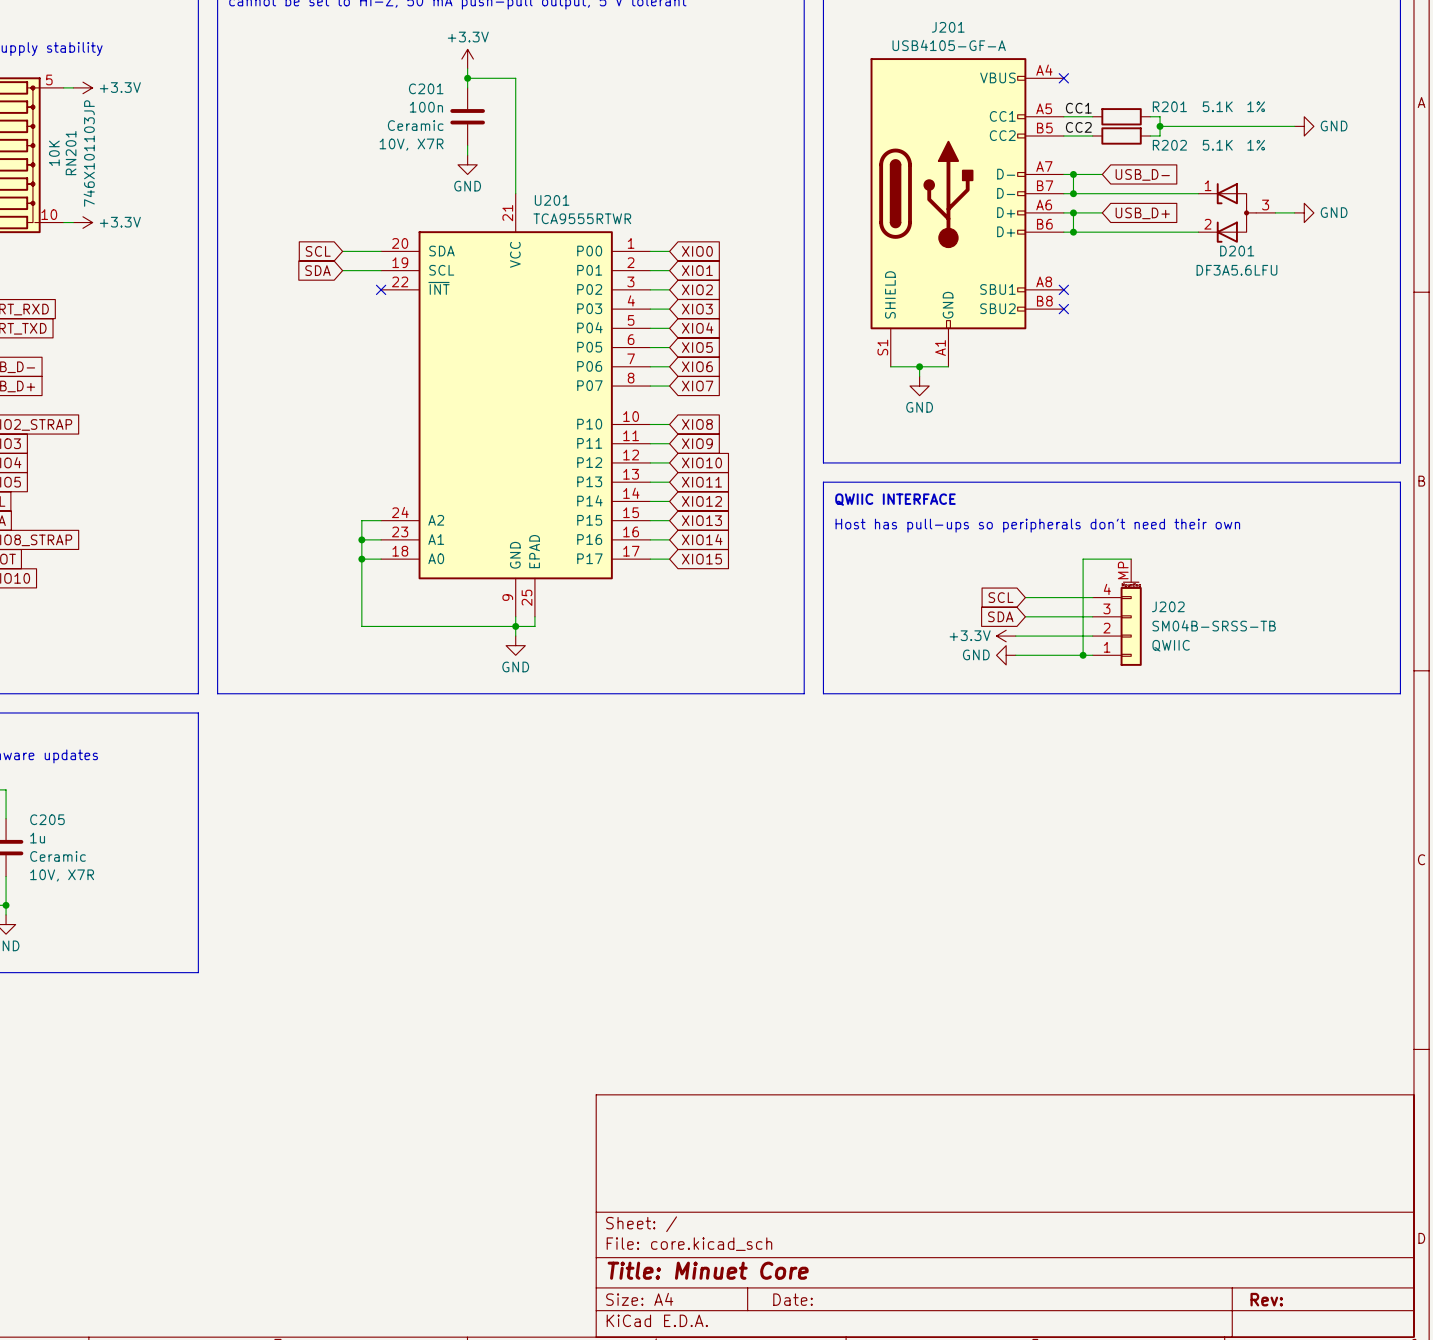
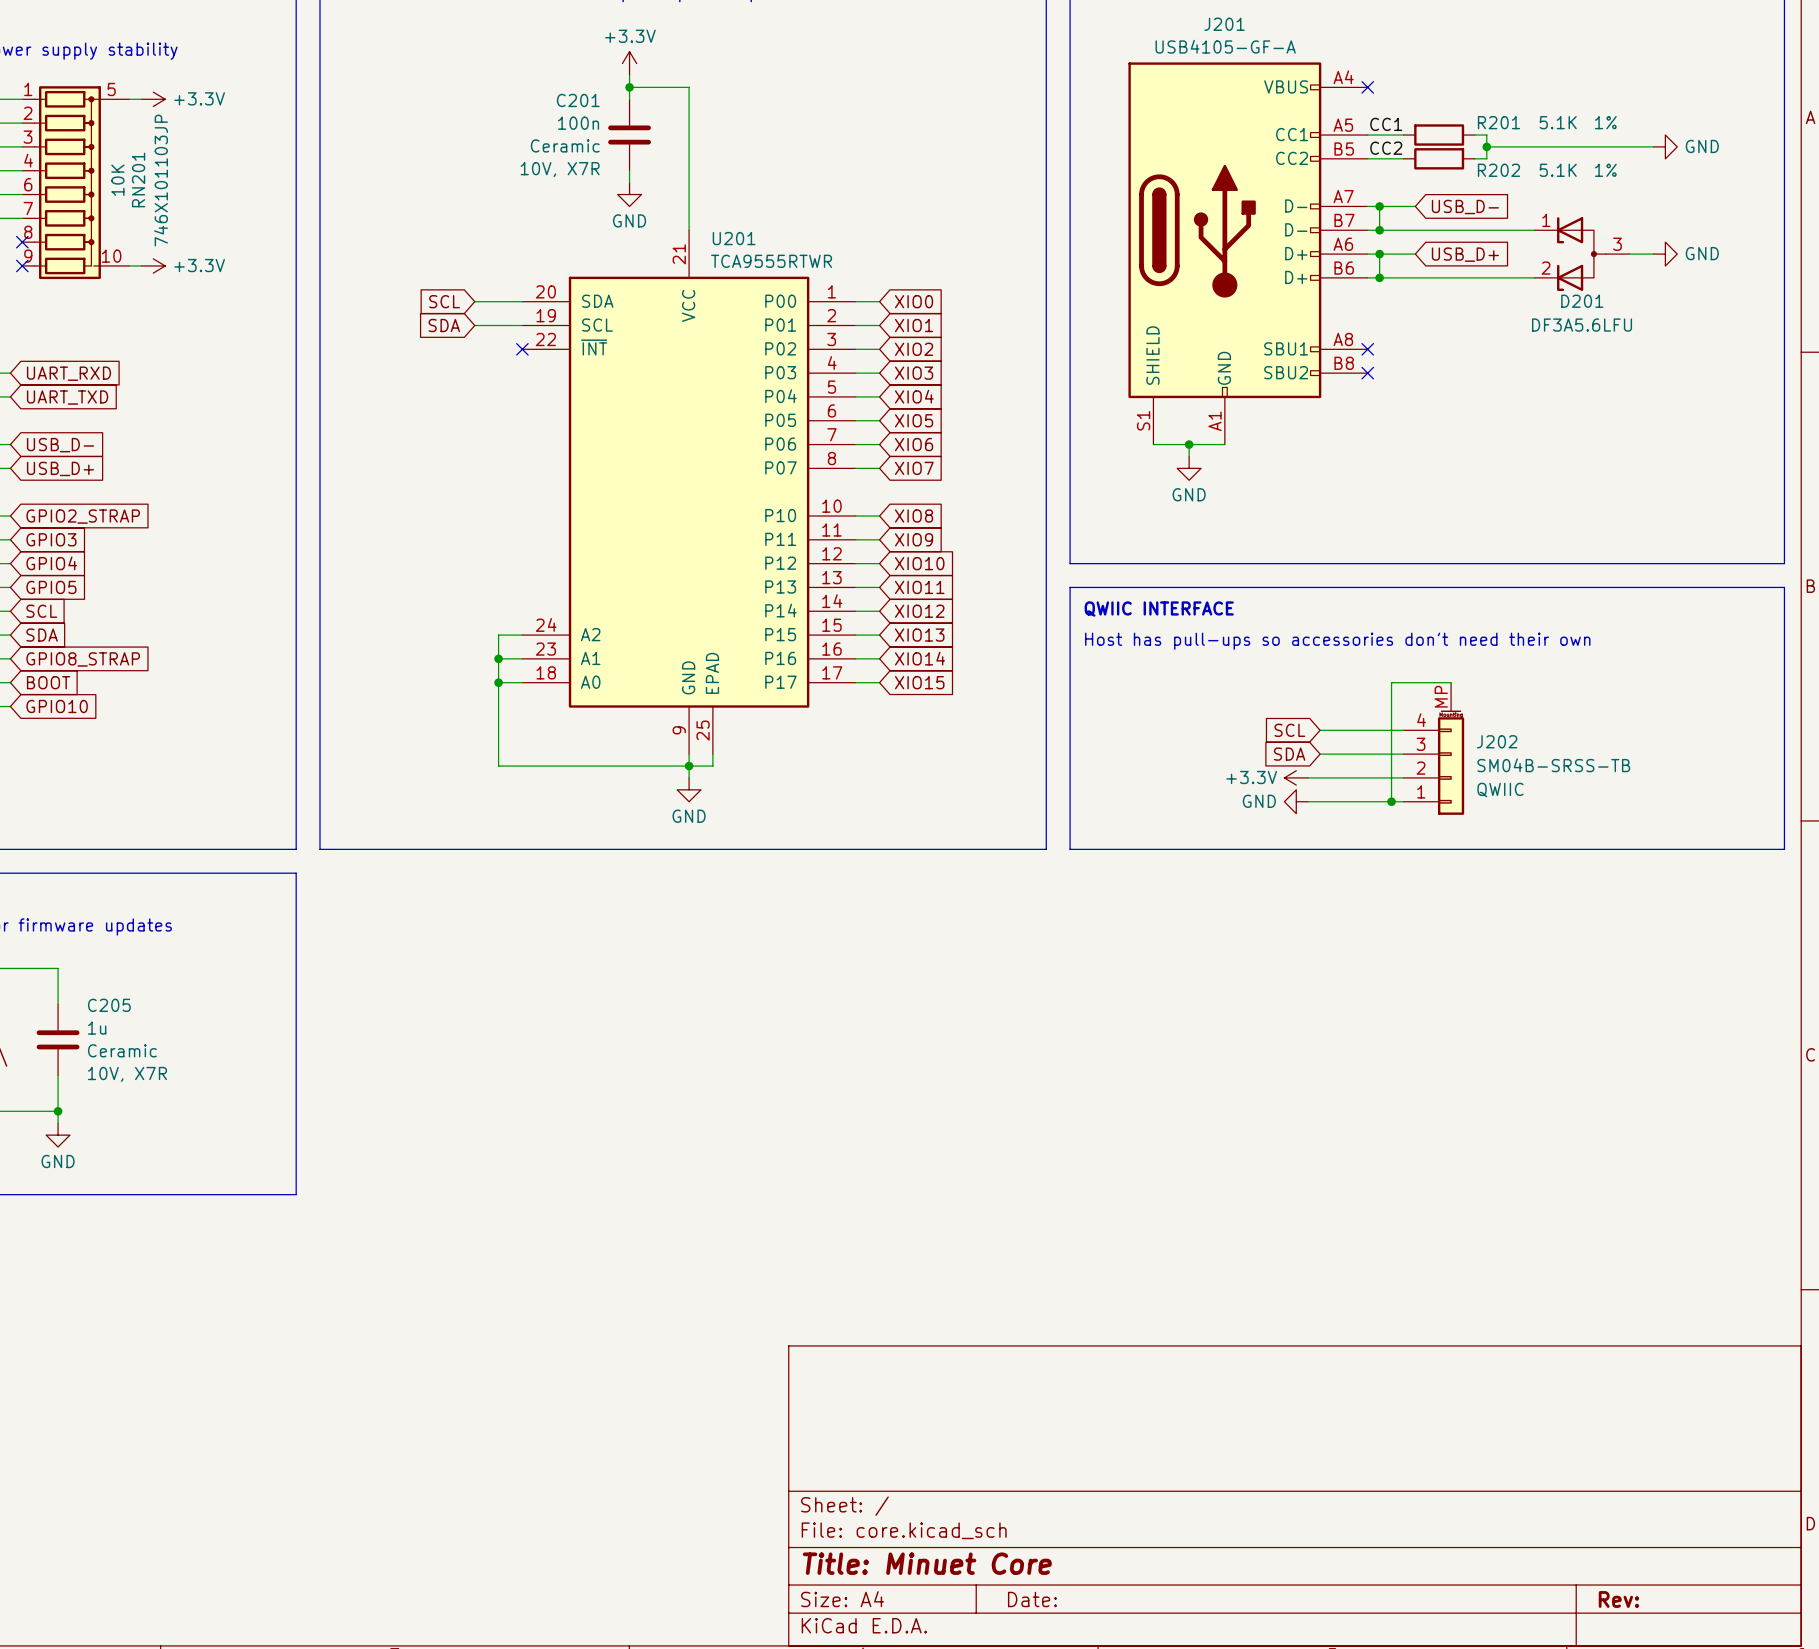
text: Host has pull-ups so peripherals don't need their own (1037, 525) -> Host has pull-ups so accessories don't need their own (1337, 641)

